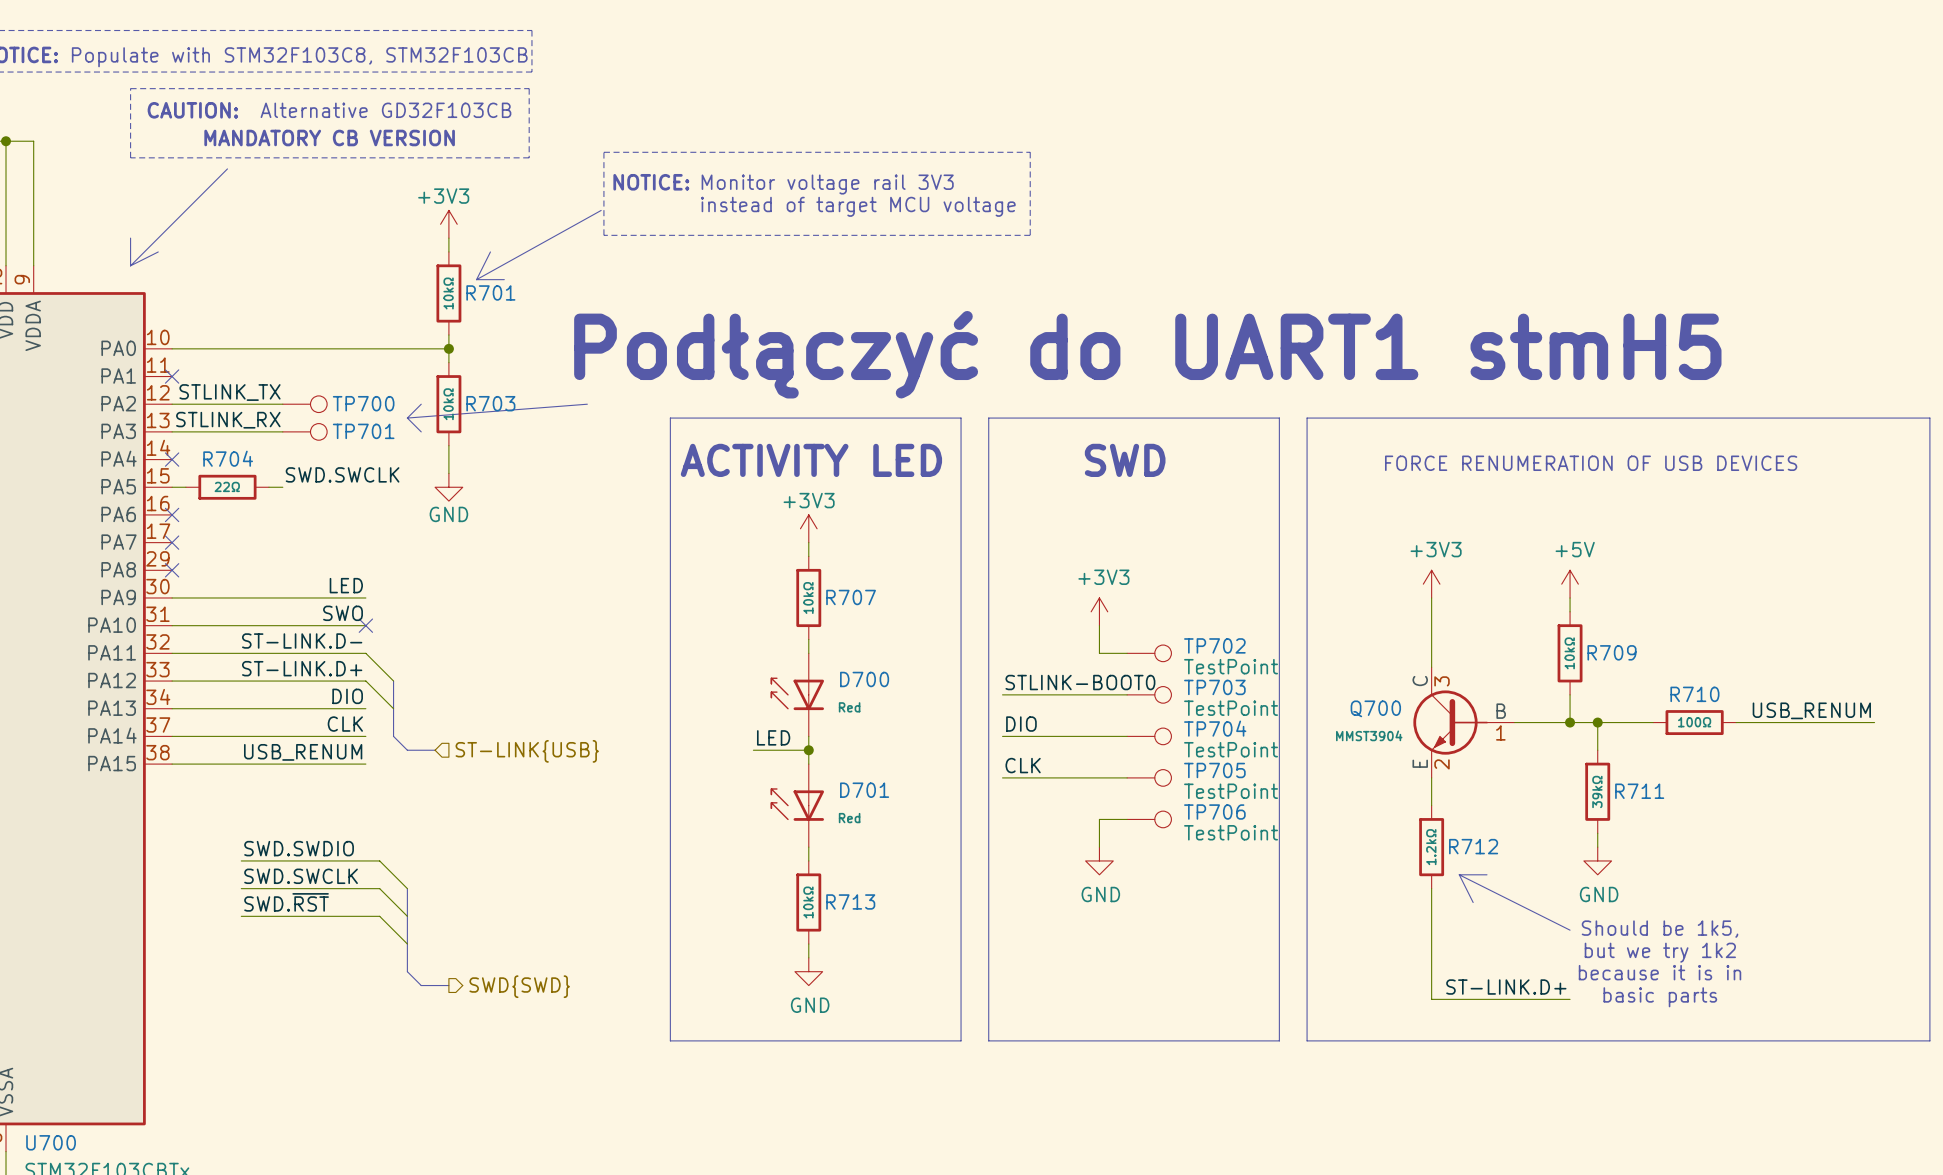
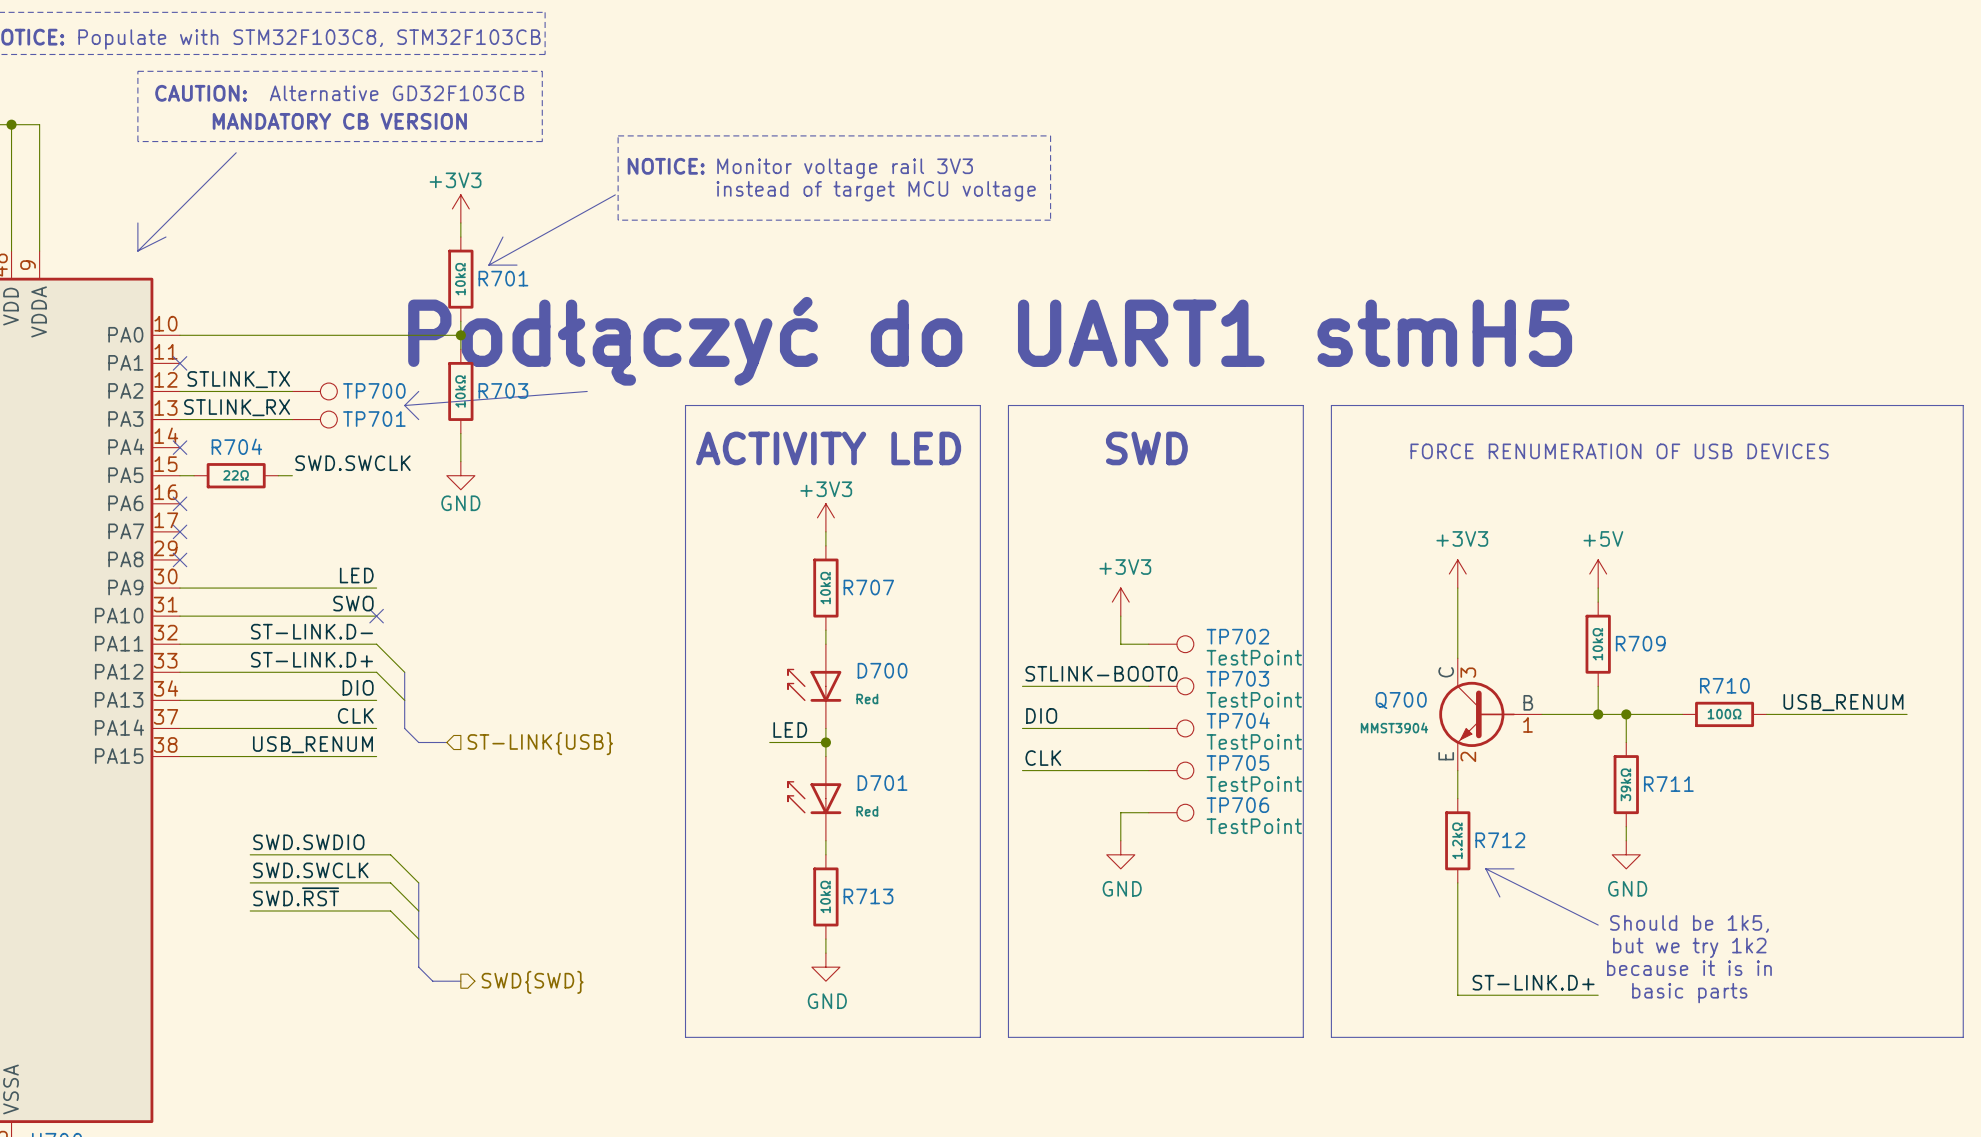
text position: Podłączyć do UART1 stmH5 (1147, 354) -> Podłączyć do UART1 stmH5 (990, 341)
line: (421, 404) (407, 418) -> (418, 391) (404, 405)
line: (587, 404) (407, 418) -> (587, 391) (404, 405)
line: (407, 418) (421, 431) -> (404, 405) (418, 419)

